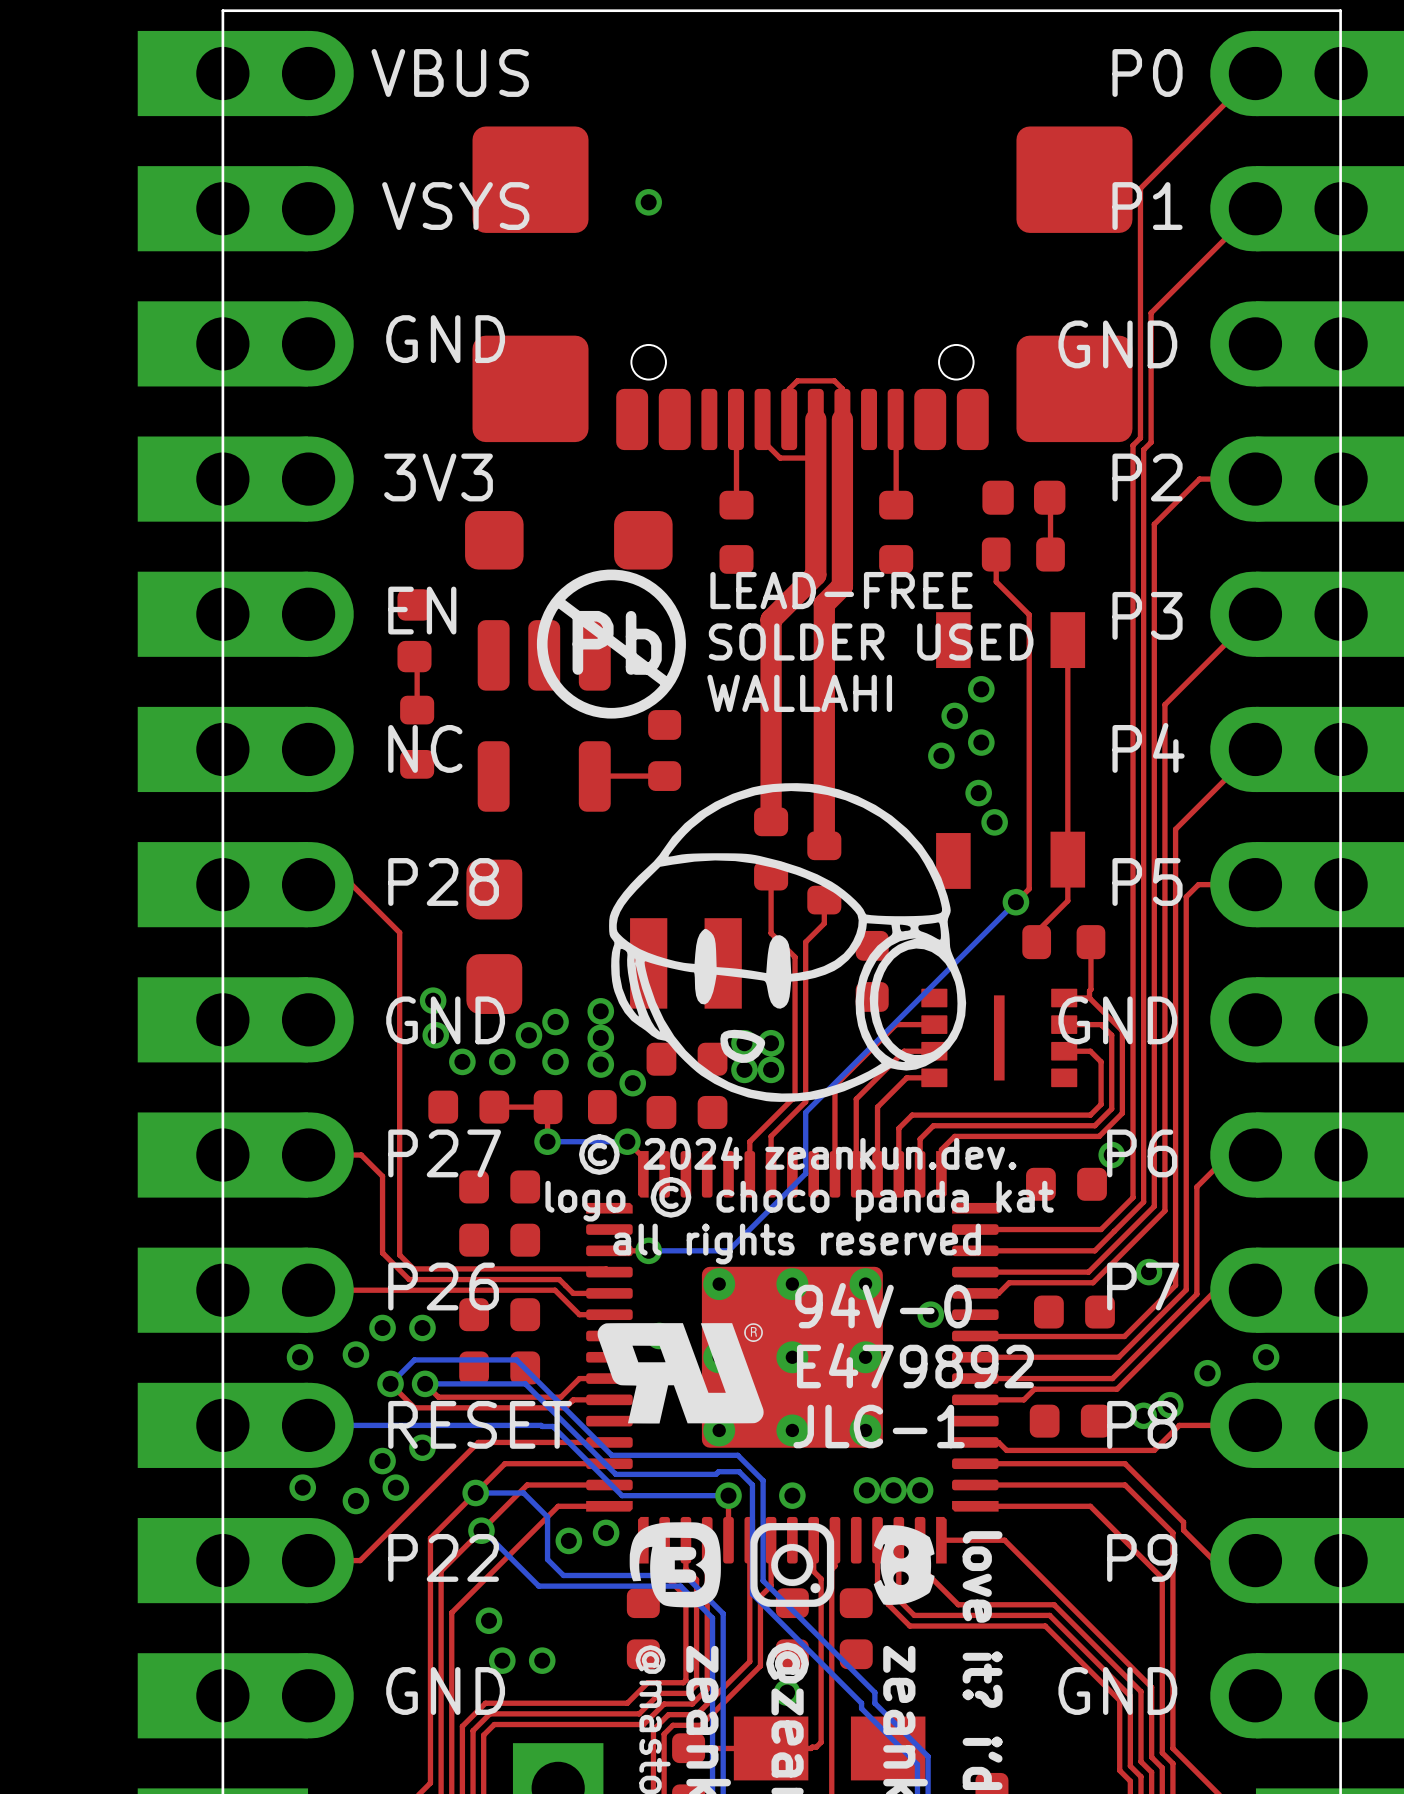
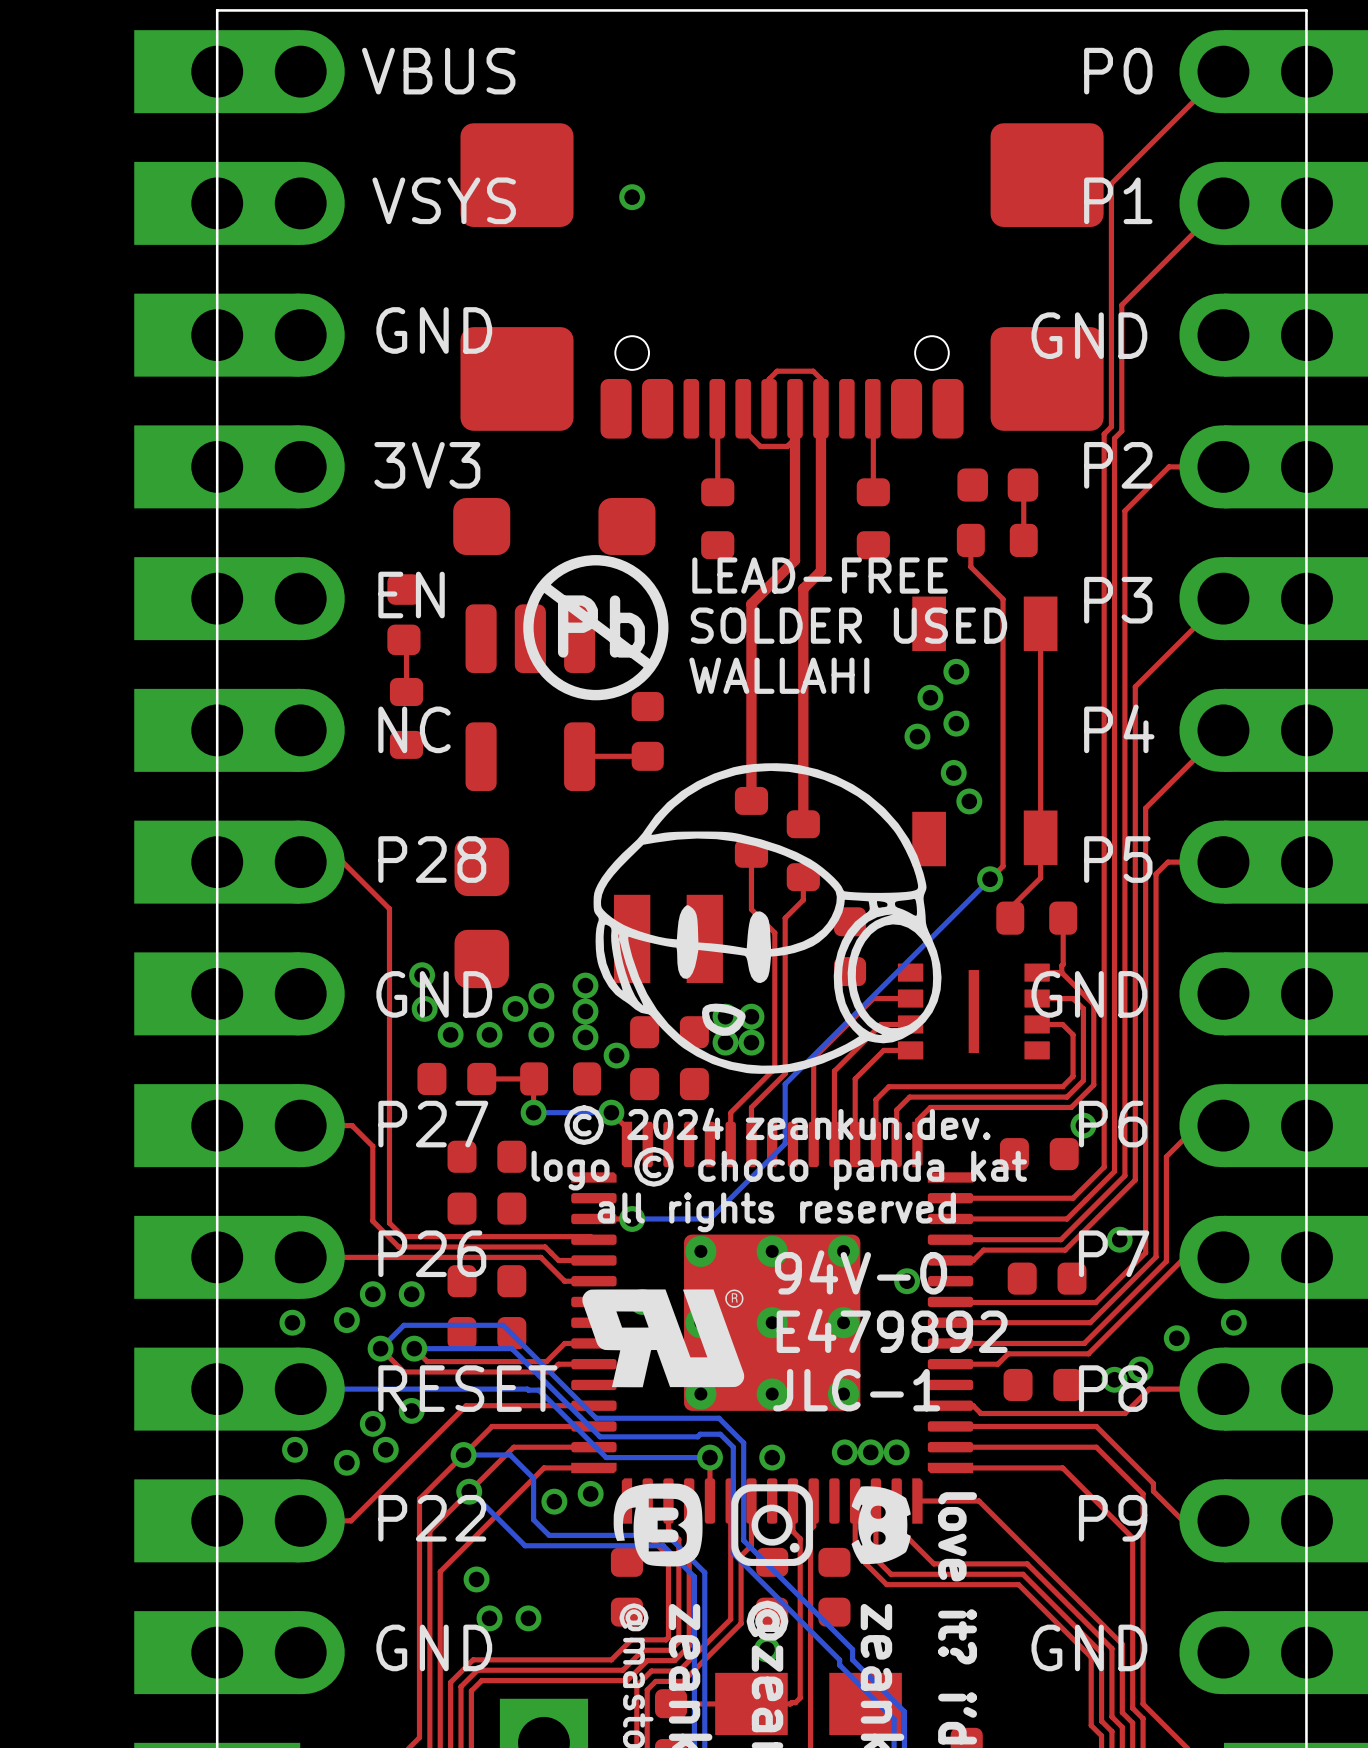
top track width: thick (815, 419) (815, 575) (771, 619) (771, 821) -> thin (795, 408) (795, 560) (751, 603) (751, 800)
top track width: thick (842, 419) (842, 586) (824, 604) (824, 845) -> thin (820, 408) (820, 571) (803, 588) (803, 824)

